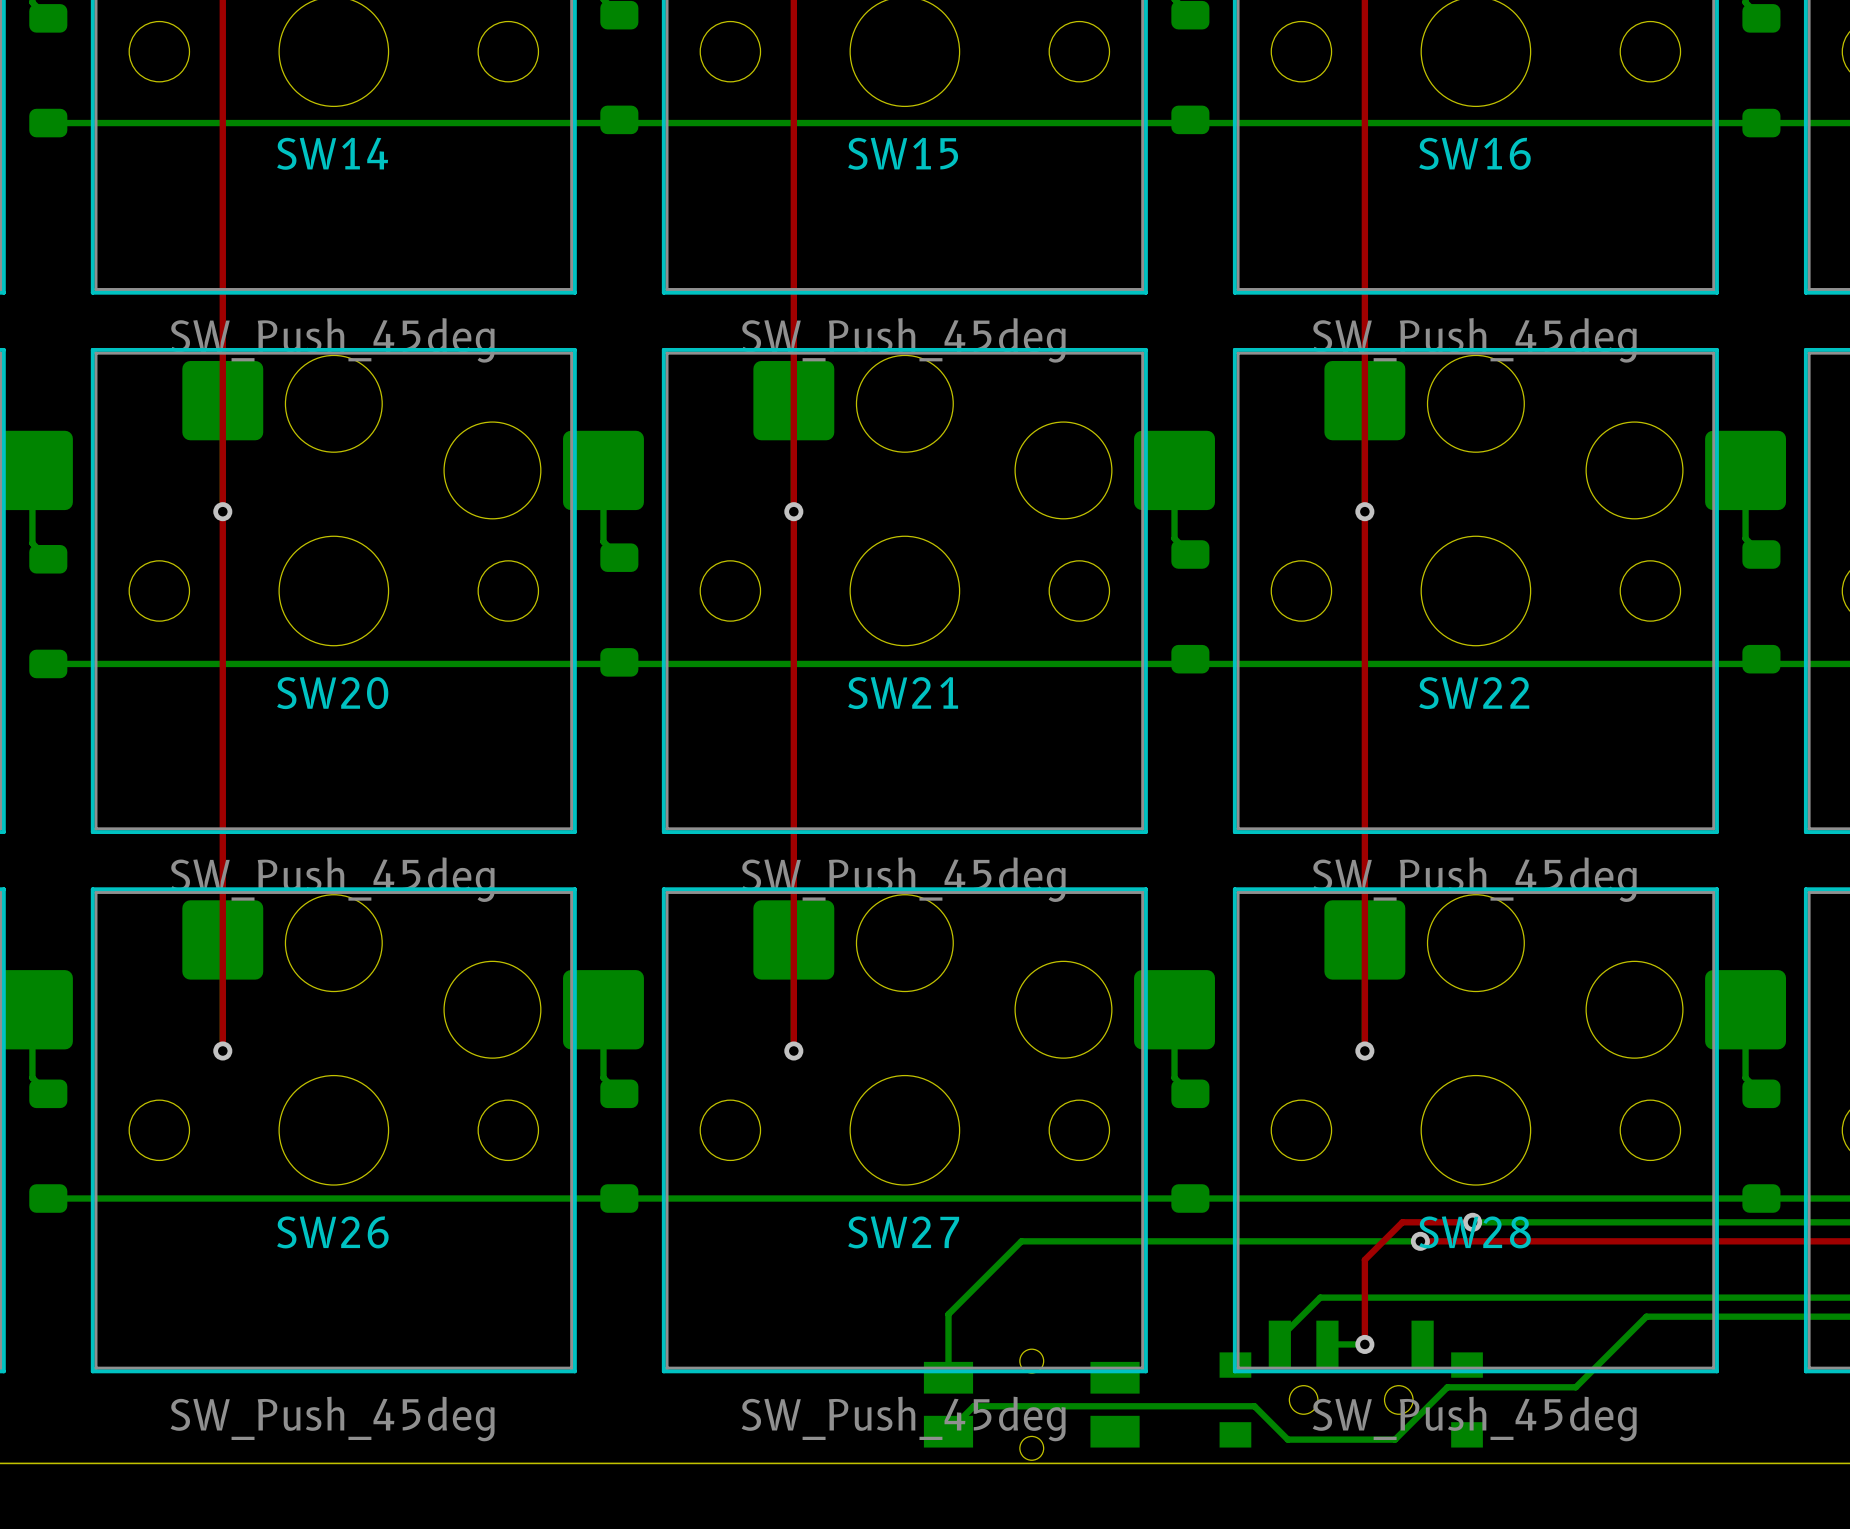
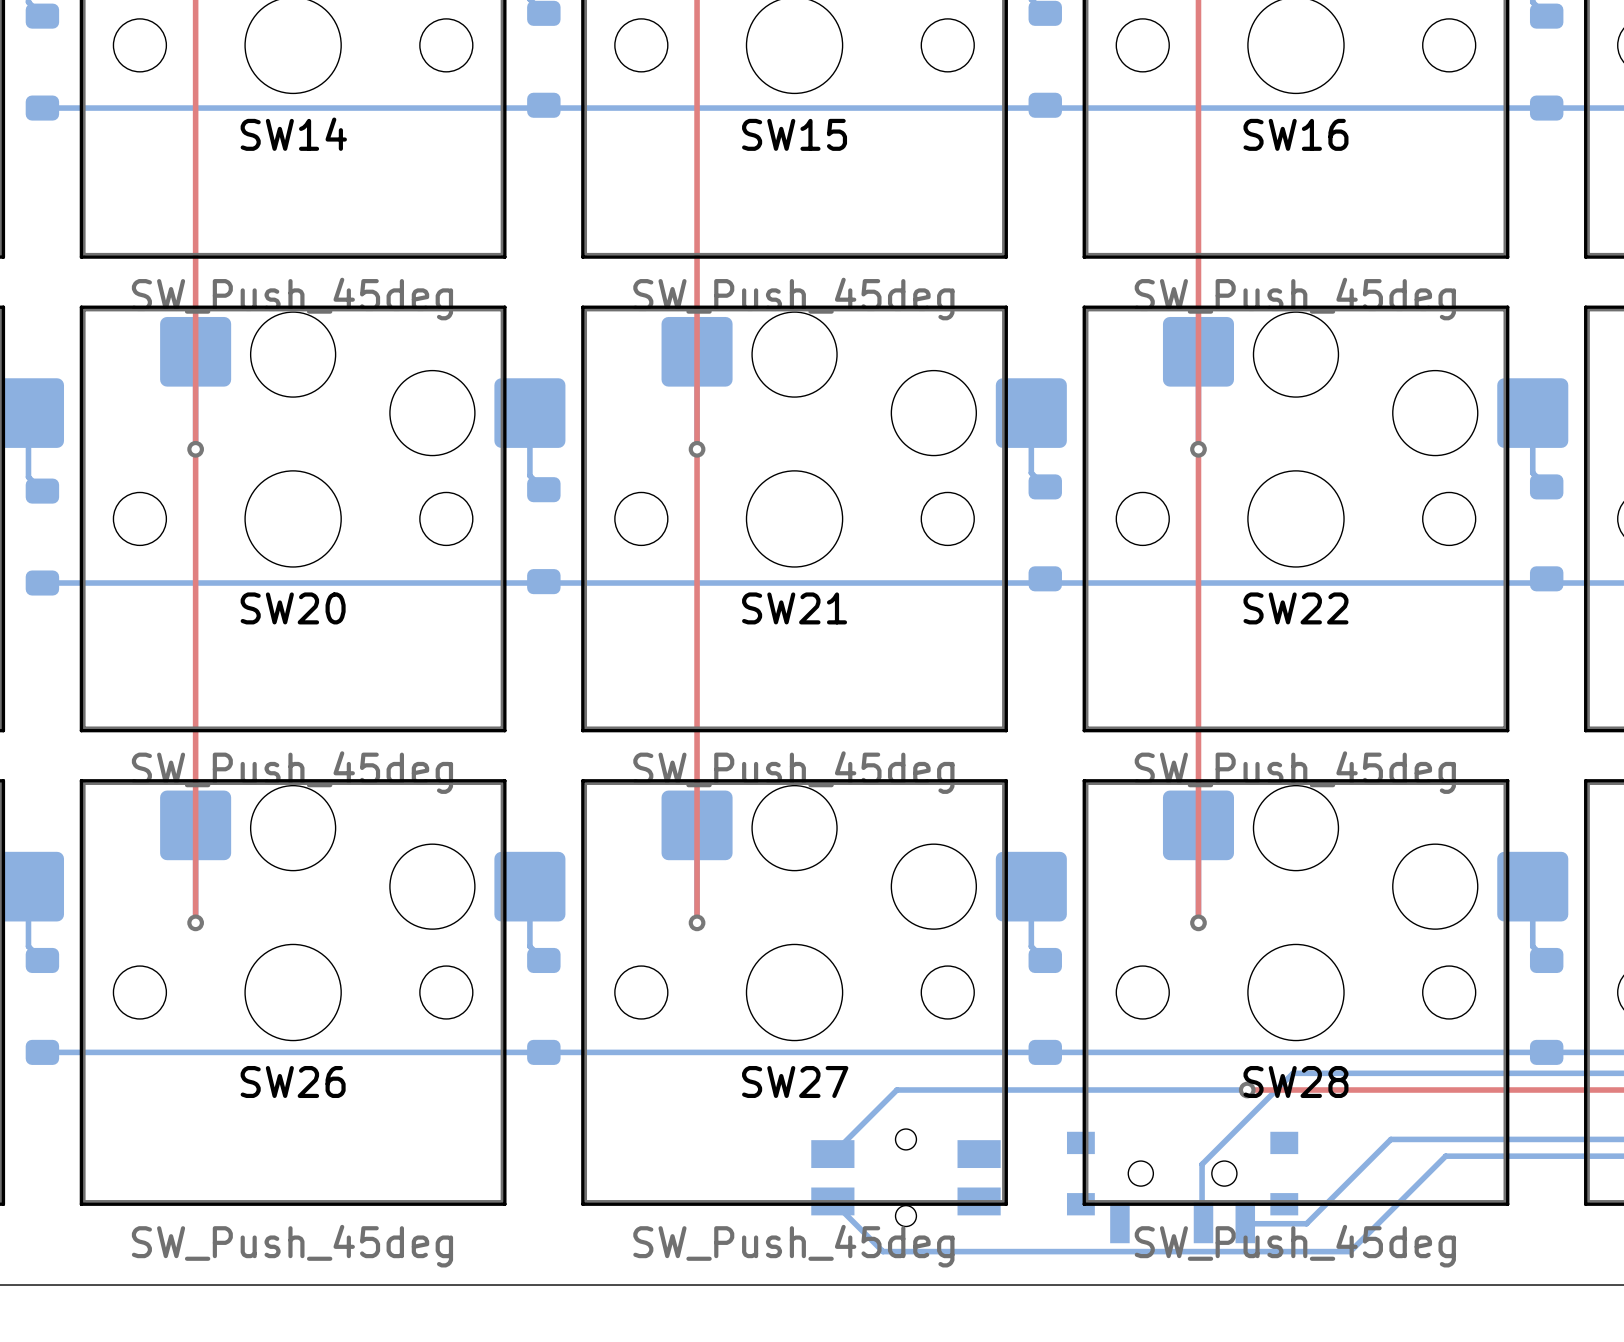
bottom track: none -> (1293, 1073) (1202, 1164) (1203, 1222)
top track: (1472, 1222) (1402, 1222) (1364, 1259) (1364, 1344) -> none
via: (1472, 1222) -> none
bottom track: (1584, 1297) (1320, 1297) (1279, 1338) (1279, 1344) -> (1390, 1139) (1306, 1223) (1245, 1222)
bottom track: (948, 1314) (948, 1380) -> none
bottom track: (1327, 1344) (1364, 1344) -> none
via: (1364, 1344) -> none
part rotation: 0° (1351, 1384) -> 180° (1182, 1187)
bottom track: (1575, 1387) (1447, 1387) (1395, 1439) (1287, 1439) (1254, 1406) (973, 1406) (948, 1431) -> (1383, 1218) (1350, 1251) (883, 1251) (832, 1201)
part position: (1031, 1404) -> (905, 1177)

